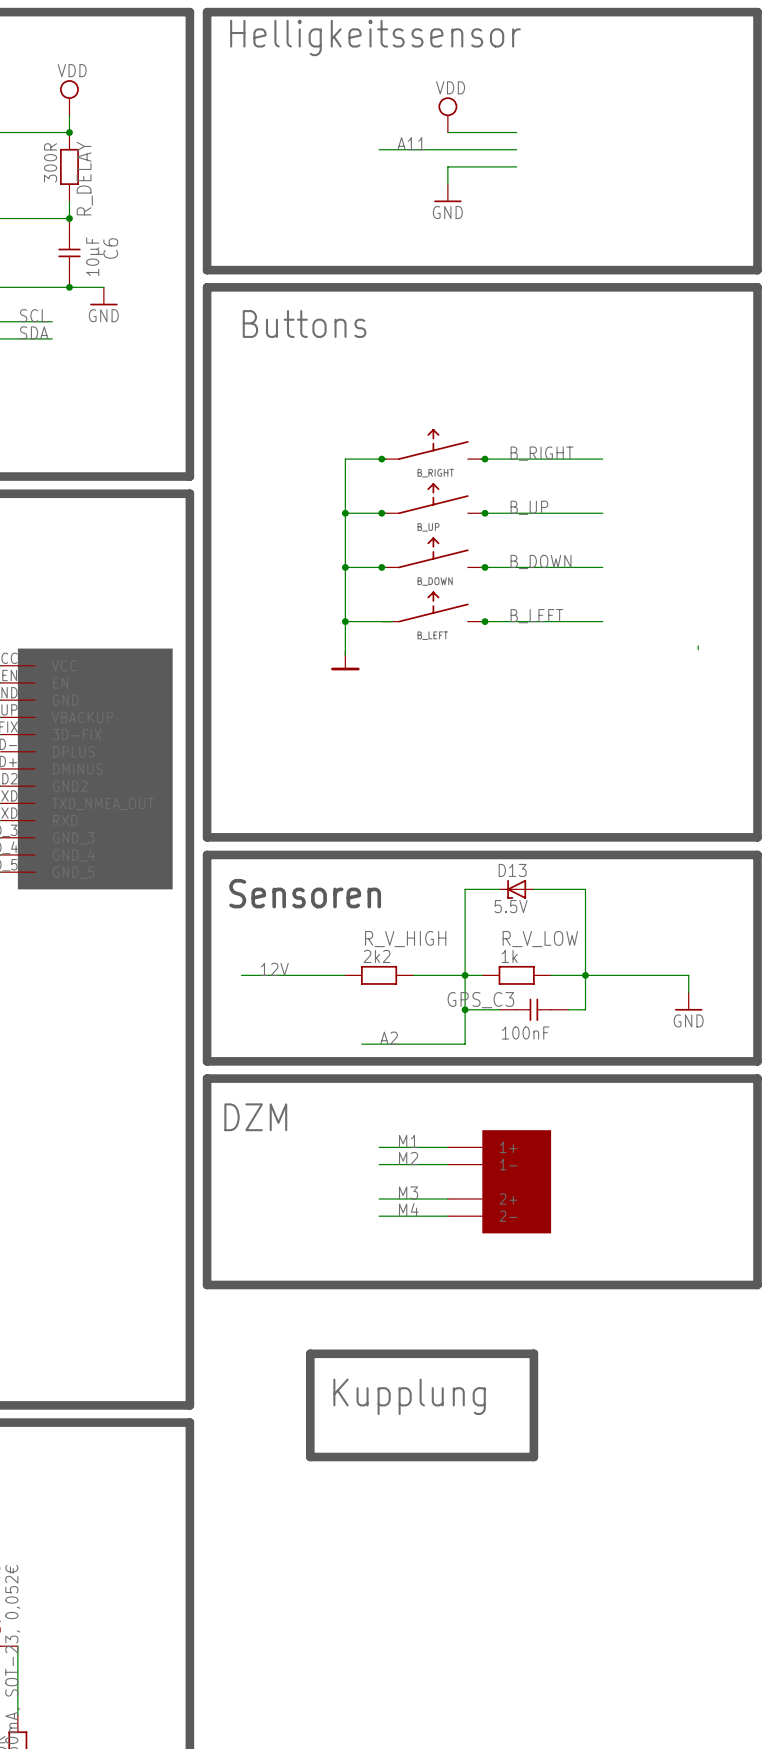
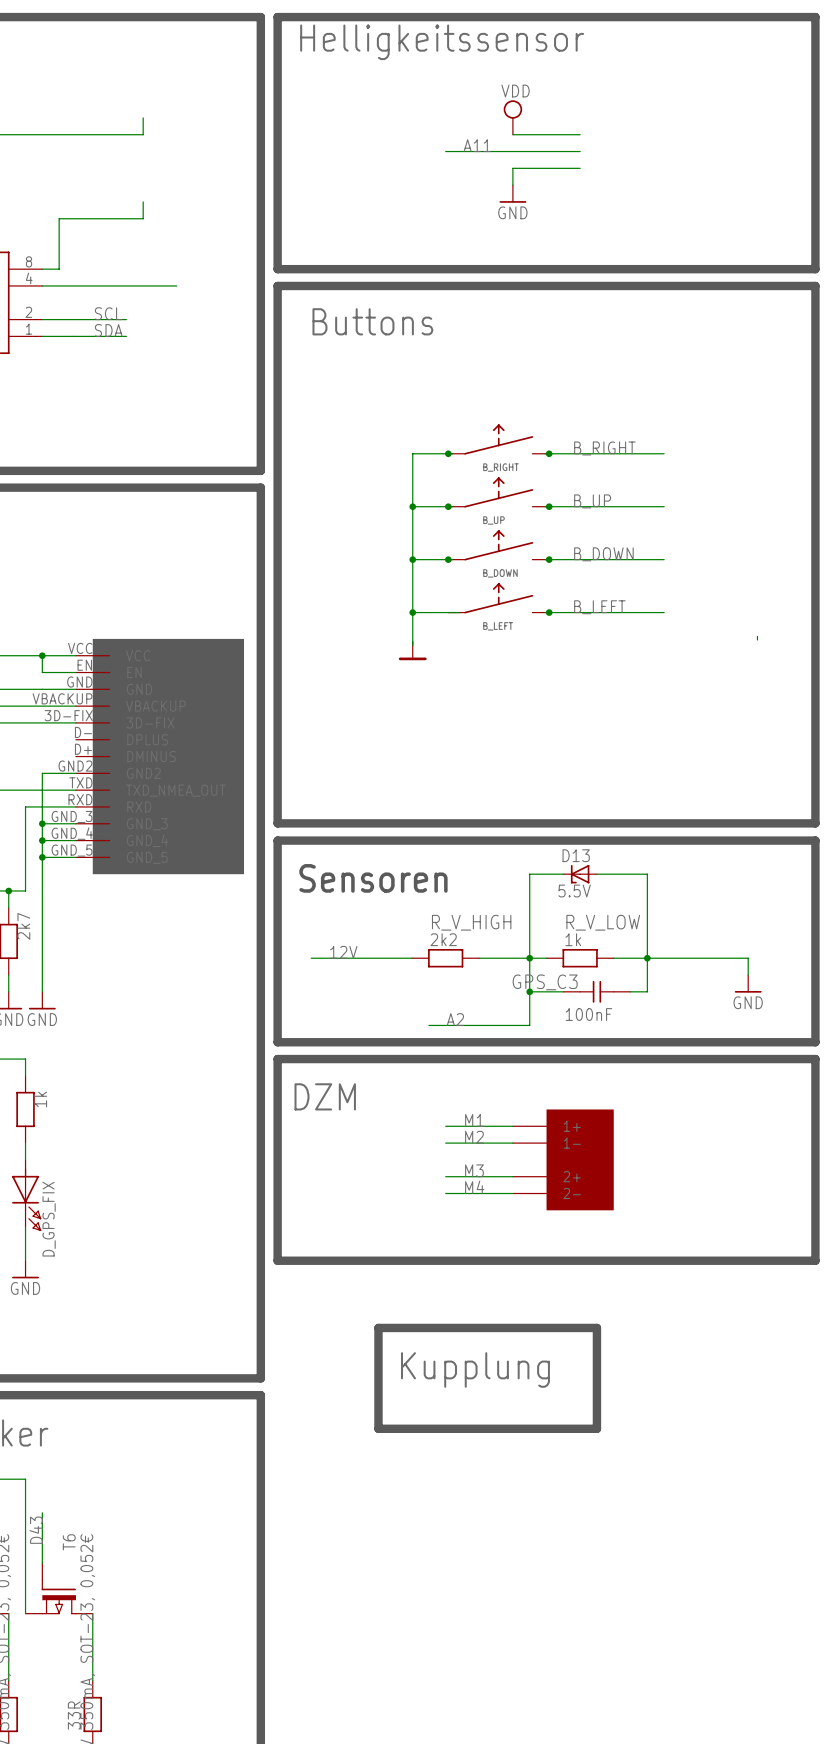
power symbol: VDD (69, 97) -> none
junction: (69, 132) -> none
R_DELAY: 300R (69, 166) -> none
junction: (69, 218) -> none
C6: 10µF (69, 252) -> none
junction: (69, 287) -> none
power symbol: GND (103, 296) -> none

